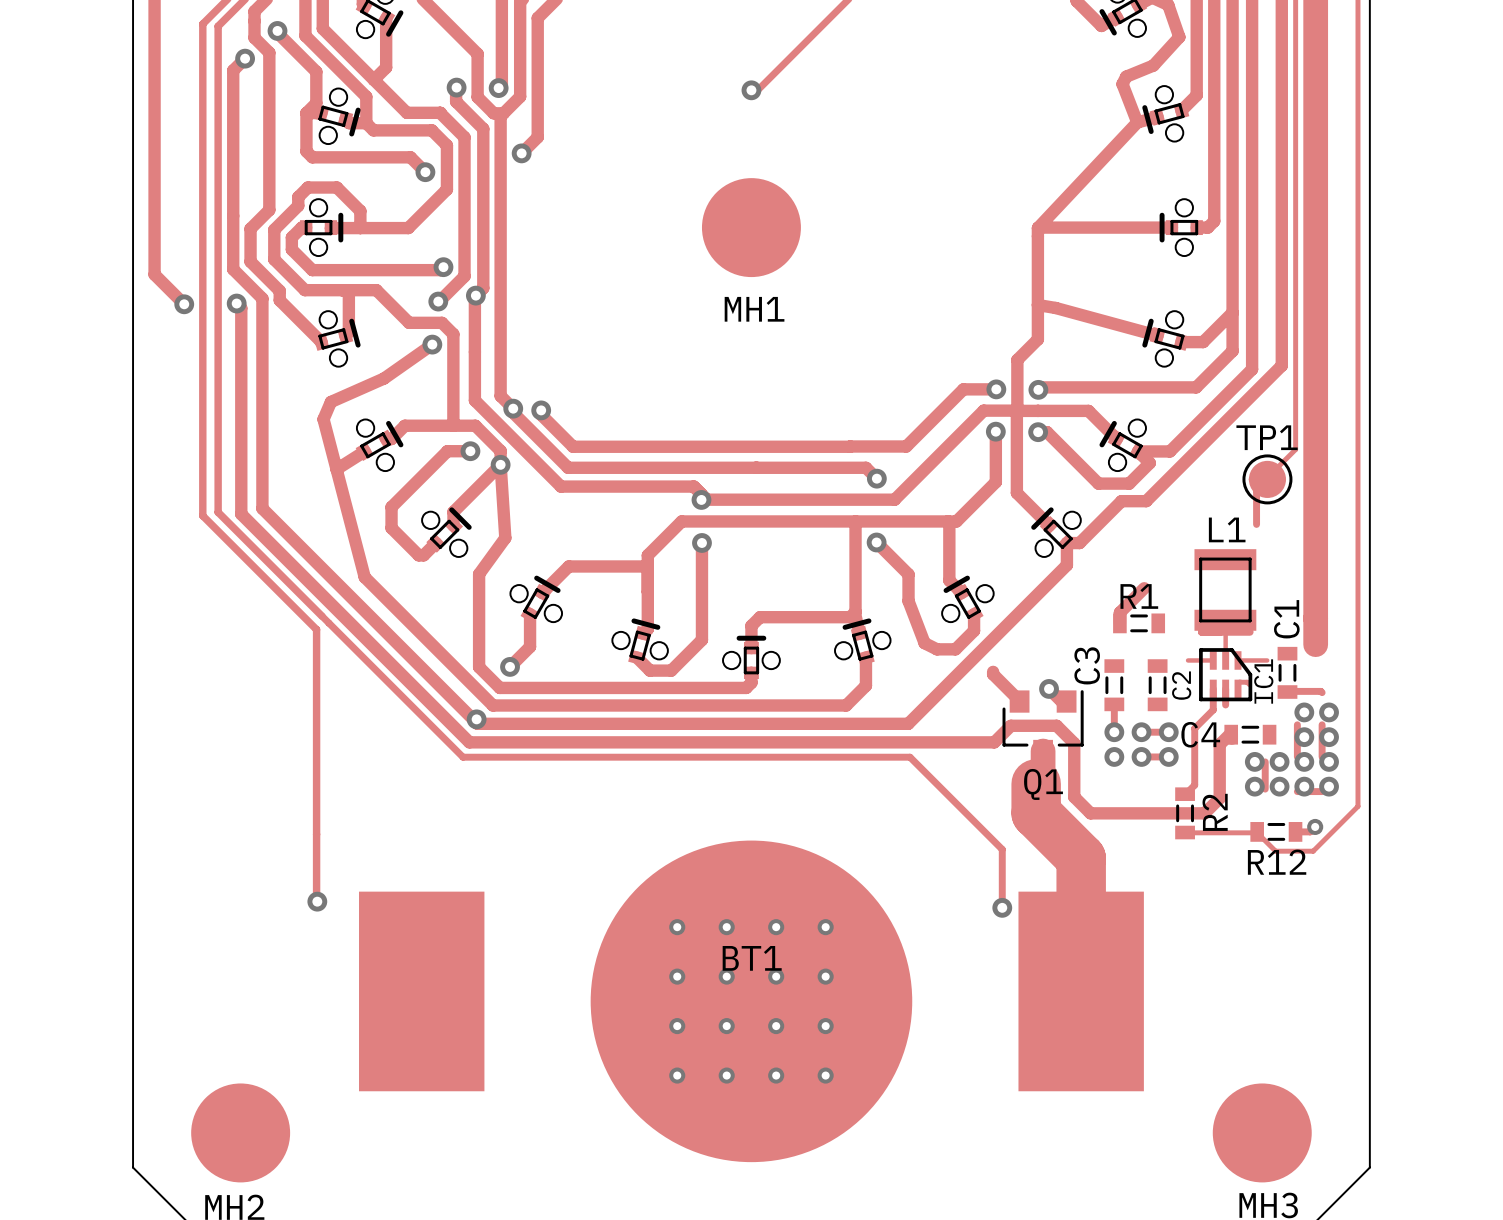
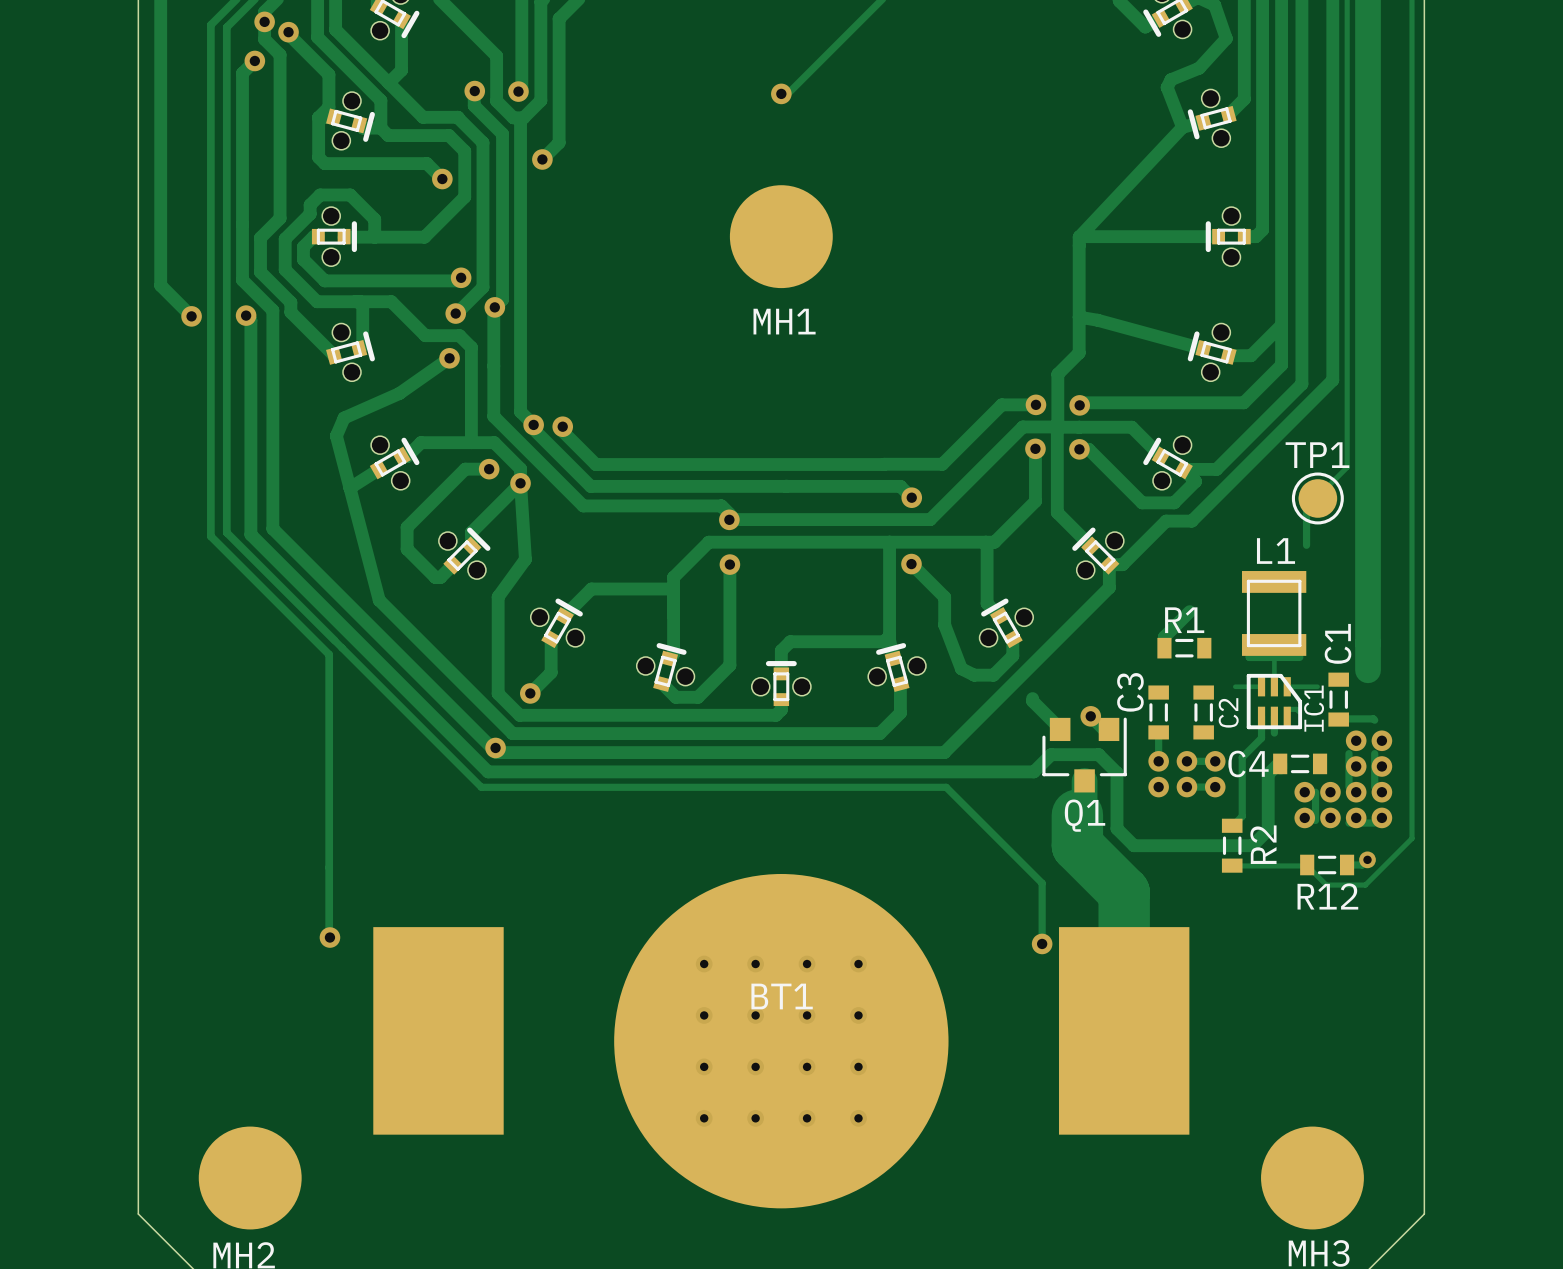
via: none -> (264, 21)

